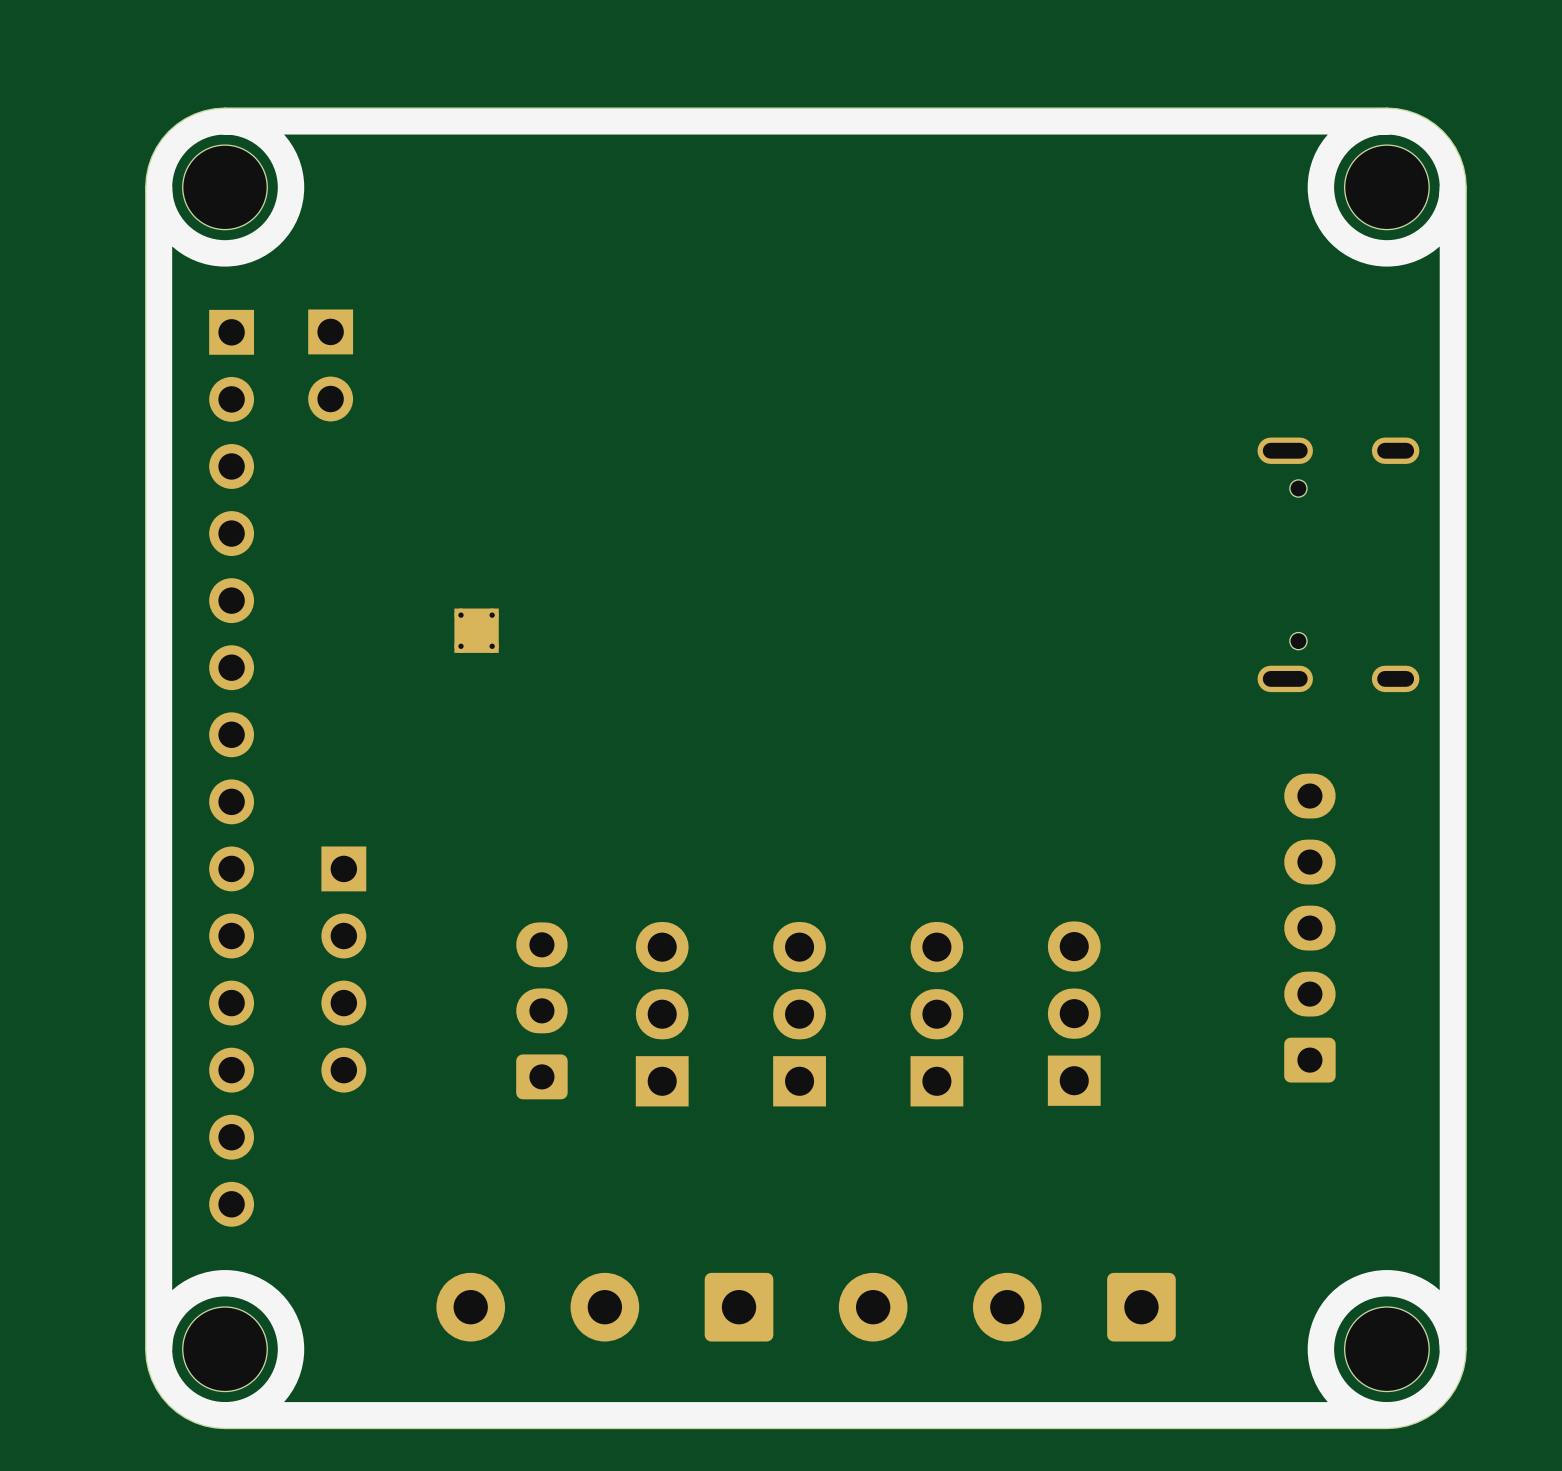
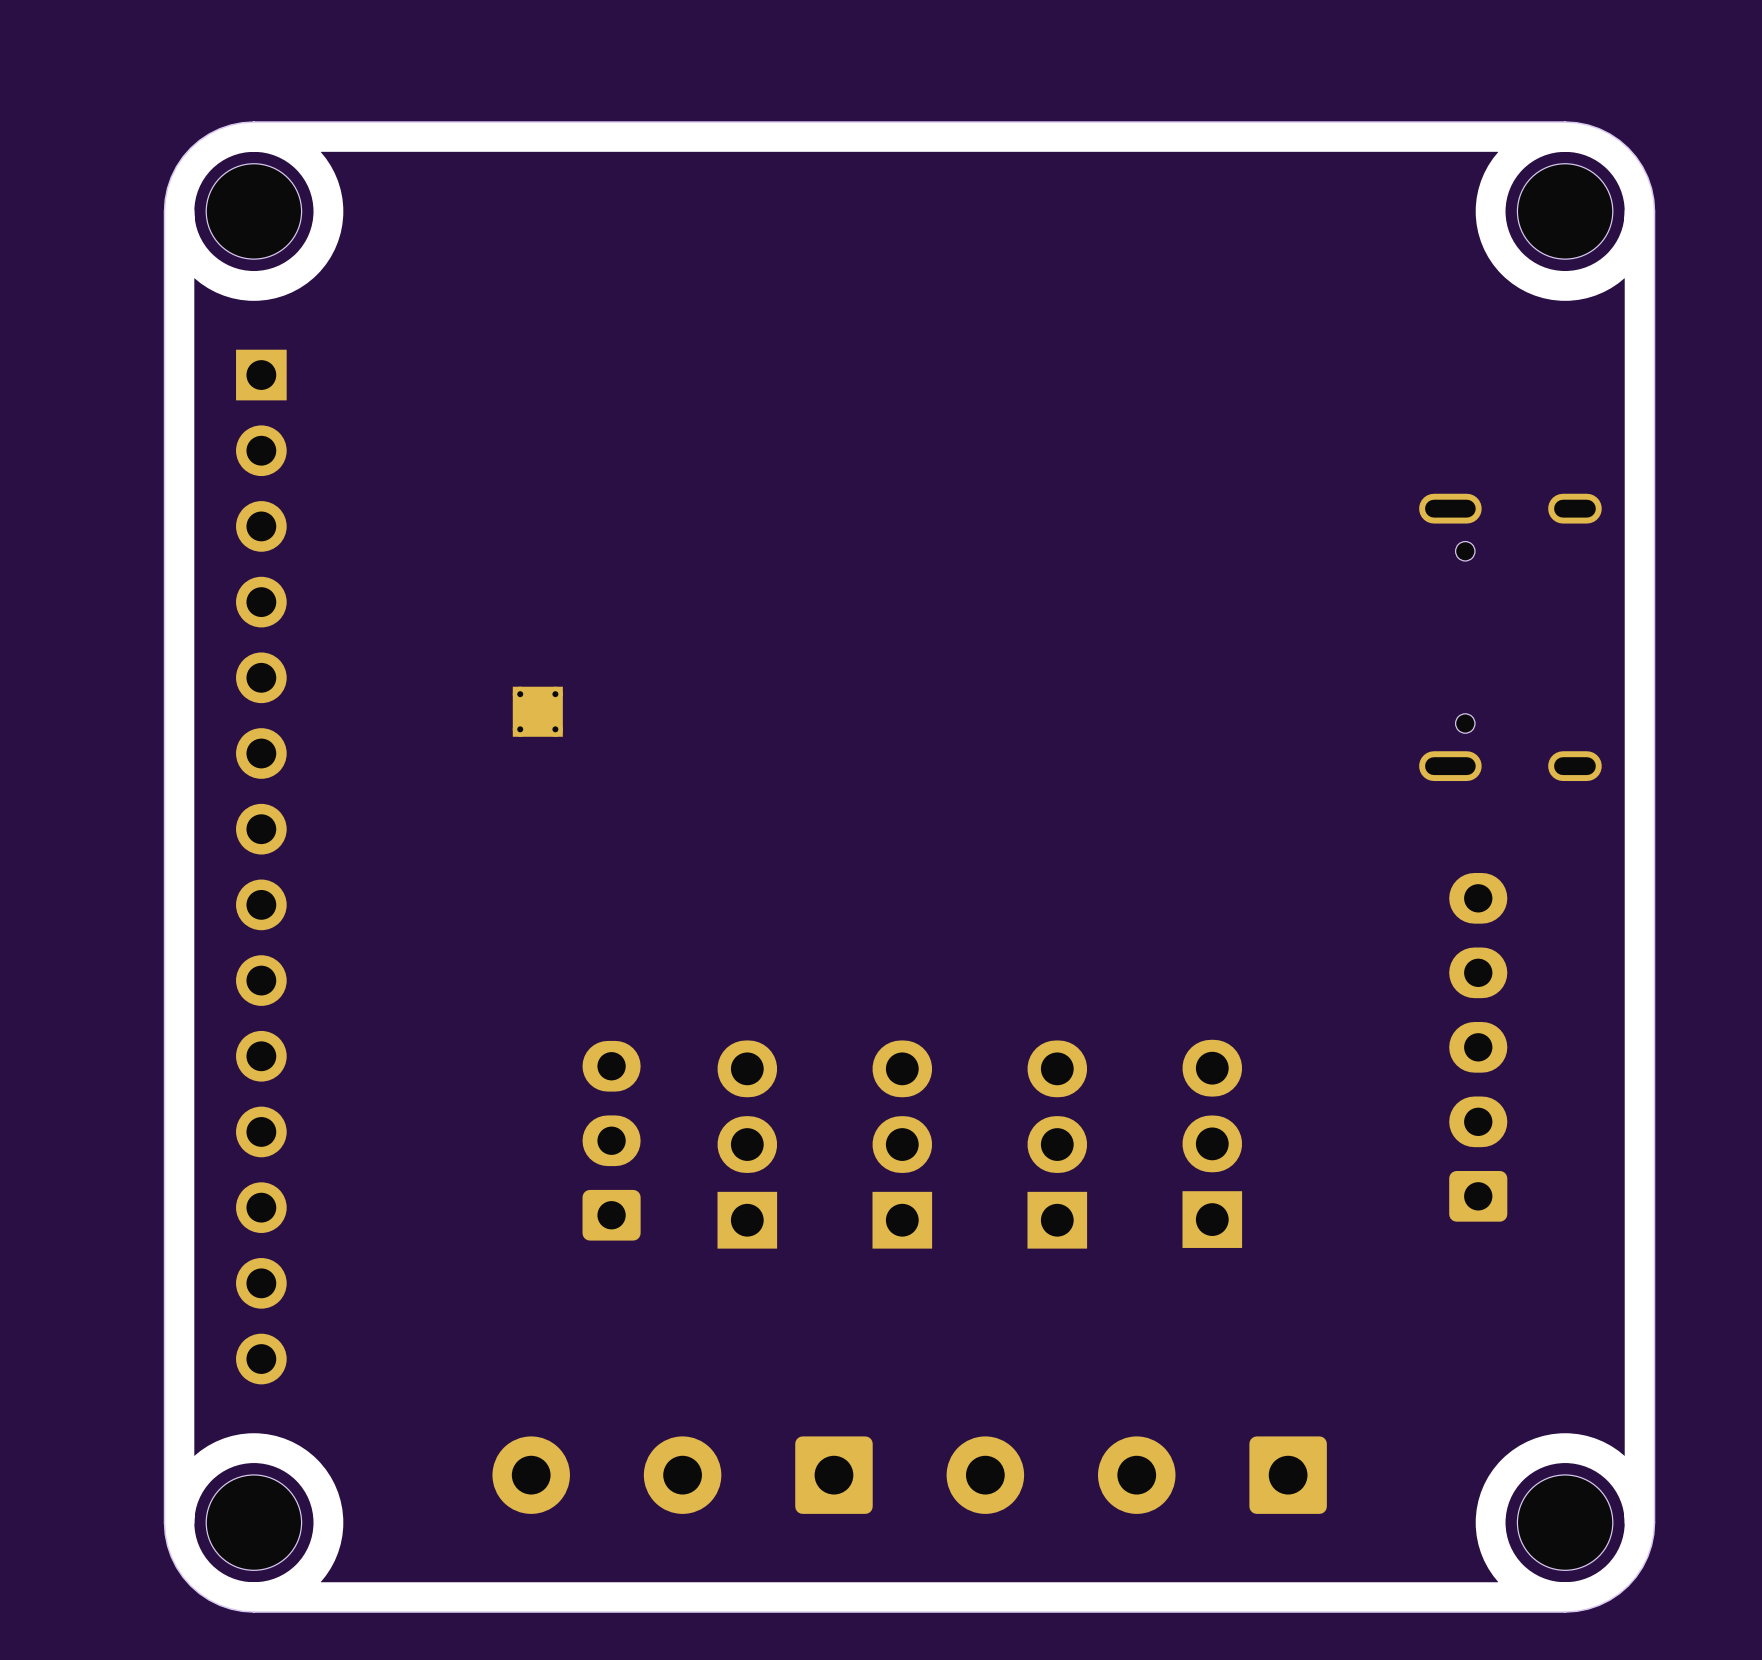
part: (330, 365) -> none
part: (343, 969) -> none

